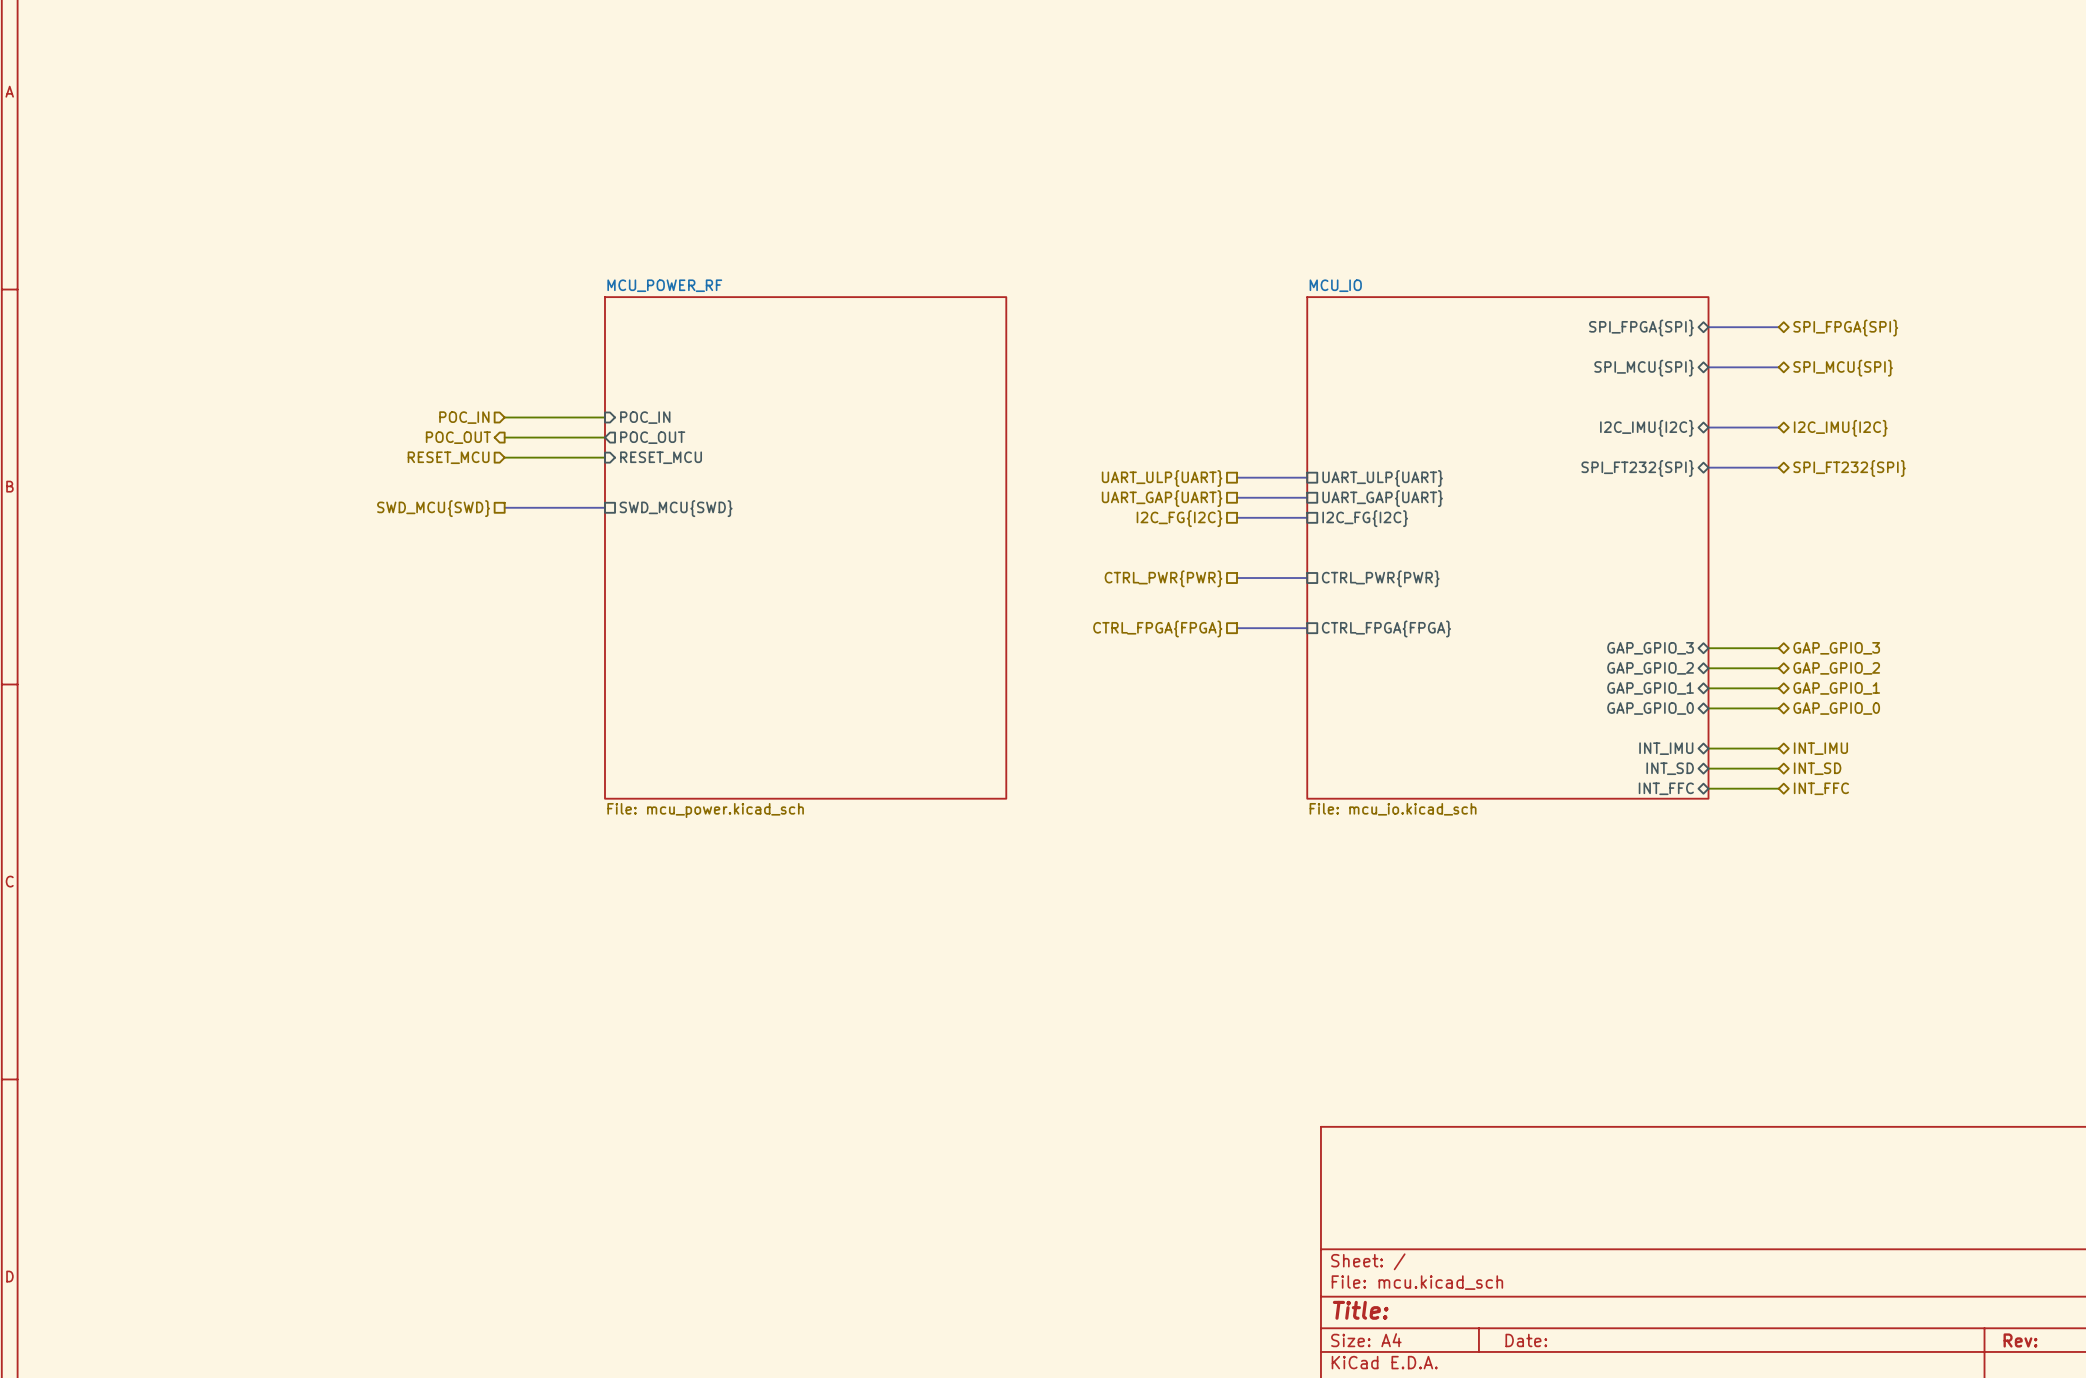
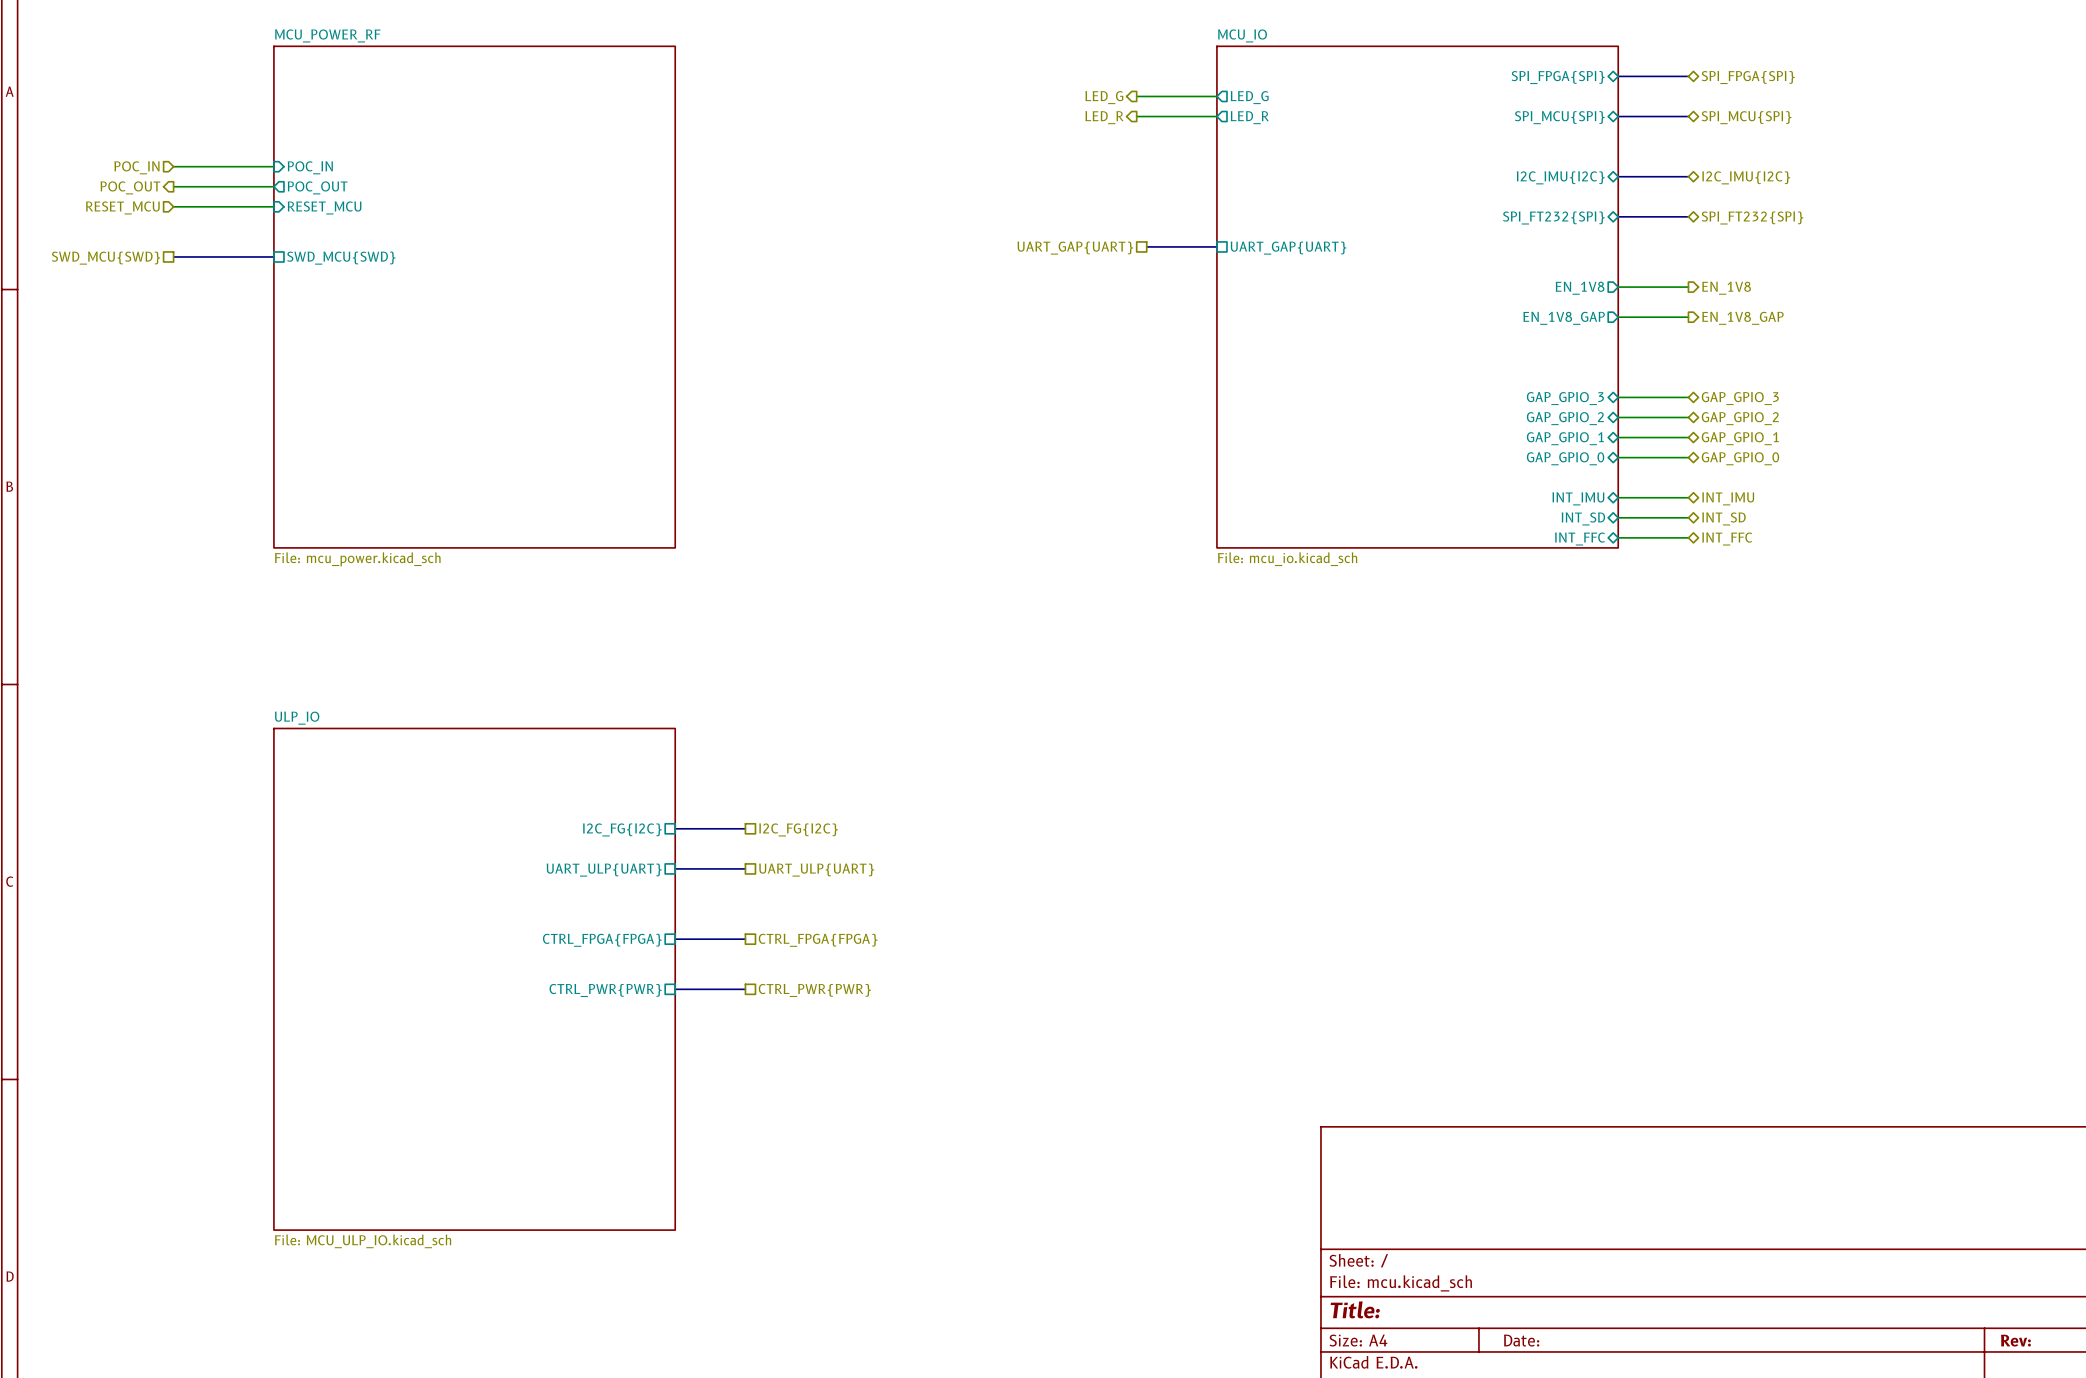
bus: none -> (1618, 76) (1688, 76)
sheet pin: none -> SPI_FPGA{SPI} (1558, 77)
hierarchical label: none -> SPI_FPGA{SPI} (1748, 77)
hierarchical label: none -> LED_G (1104, 97)
wire: none -> (1136, 96) (1216, 96)
sheet pin: none -> LED_G (1249, 97)
hierarchical label: none -> LED_R (1104, 117)
wire: none -> (1136, 116) (1216, 116)
sheet pin: none -> LED_R (1249, 117)
bus: none -> (1618, 116) (1688, 116)
sheet pin: none -> SPI_MCU{SPI} (1559, 117)
hierarchical label: none -> SPI_MCU{SPI} (1746, 117)
hierarchical label: none -> POC_IN (136, 167)
wire: none -> (173, 166) (273, 166)
sheet pin: none -> POC_IN (310, 167)
sheet pin: none -> I2C_IMU{I2C} (1560, 177)
hierarchical label: none -> I2C_IMU{I2C} (1746, 177)
hierarchical label: none -> POC_OUT (130, 187)
wire: none -> (173, 186) (273, 186)
sheet pin: none -> POC_OUT (317, 187)
hierarchical label: none -> RESET_MCU (122, 207)
wire: none -> (173, 206) (273, 206)
sheet pin: none -> RESET_MCU (324, 207)
sheet pin: none -> SPI_FT232{SPI} (1553, 217)
hierarchical label: none -> SPI_FT232{SPI} (1752, 217)
bus: none -> (1146, 246) (1216, 246)
hierarchical label: none -> UART_GAP{UART} (1075, 248)
sheet pin: none -> UART_GAP{UART} (1288, 248)
bus: none -> (173, 256) (273, 256)
hierarchical label: none -> SWD_MCU{SWD} (105, 258)
sheet pin: none -> SWD_MCU{SWD} (341, 258)
sheet pin: none -> EN_1V8 (1580, 288)
wire: none -> (1618, 287) (1688, 287)
hierarchical label: none -> EN_1V8 (1726, 288)
sheet MCU_POWER_RF: none -> File: mcu_power.kicad_sch (474, 297)
sheet MCU_IO: none -> File: mcu_io.kicad_sch (1417, 297)
sheet pin: none -> EN_1V8_GAP (1564, 318)
wire: none -> (1618, 317) (1688, 317)
hierarchical label: none -> EN_1V8_GAP (1742, 318)
bus: (1708, 327) (1778, 327) -> (1618, 176) (1688, 176)
sheet pin: SPI_FPGA{SPI} (1641, 328) -> none
hierarchical label: SPI_FPGA{SPI} (1845, 328) -> none
bus: (1708, 367) (1778, 367) -> (1618, 216) (1688, 216)
sheet pin: SPI_MCU{SPI} (1644, 368) -> none
hierarchical label: SPI_MCU{SPI} (1843, 368) -> none
sheet pin: none -> GAP_GPIO_3 (1565, 398)
wire: none -> (1618, 397) (1688, 397)
hierarchical label: none -> GAP_GPIO_3 (1740, 398)
hierarchical label: POC_IN (464, 417) -> none
wire: (504, 417) (604, 417) -> none
sheet pin: POC_IN (645, 417) -> none
sheet pin: none -> GAP_GPIO_2 (1565, 418)
wire: none -> (1618, 417) (1688, 417)
hierarchical label: none -> GAP_GPIO_2 (1740, 418)
bus: (1708, 427) (1778, 427) -> none
sheet pin: I2C_IMU{I2C} (1646, 428) -> none
hierarchical label: I2C_IMU{I2C} (1840, 428) -> none
hierarchical label: POC_OUT (458, 437) -> none
wire: (504, 437) (604, 437) -> none
sheet pin: POC_OUT (652, 437) -> none
sheet pin: none -> GAP_GPIO_1 (1565, 438)
wire: none -> (1618, 437) (1688, 437)
hierarchical label: none -> GAP_GPIO_1 (1740, 438)
hierarchical label: RESET_MCU (448, 457) -> none
wire: (504, 457) (604, 457) -> none
sheet pin: RESET_MCU (661, 457) -> none
sheet pin: none -> GAP_GPIO_0 (1565, 458)
wire: none -> (1618, 457) (1688, 457)
hierarchical label: none -> GAP_GPIO_0 (1740, 458)
bus: (1708, 467) (1778, 467) -> none
sheet pin: SPI_FT232{SPI} (1637, 468) -> none
hierarchical label: SPI_FT232{SPI} (1849, 468) -> none
bus: (1237, 477) (1307, 477) -> none
hierarchical label: UART_ULP{UART} (1162, 478) -> none
sheet pin: UART_ULP{UART} (1382, 478) -> none
bus: (1237, 497) (1307, 497) -> none
sheet pin: none -> INT_IMU (1578, 498)
hierarchical label: none -> INT_IMU (1728, 498)
hierarchical label: UART_GAP{UART} (1162, 498) -> none
sheet pin: UART_GAP{UART} (1382, 498) -> none
bus: (504, 507) (604, 507) -> none
hierarchical label: SWD_MCU{SWD} (433, 508) -> none
sheet pin: SWD_MCU{SWD} (676, 508) -> none
bus: (1237, 517) (1307, 517) -> none
sheet pin: none -> INT_SD (1583, 518)
hierarchical label: none -> INT_SD (1723, 518)
hierarchical label: I2C_FG{I2C} (1179, 518) -> none
sheet pin: I2C_FG{I2C} (1365, 518) -> none
sheet pin: none -> INT_FFC (1580, 539)
hierarchical label: none -> INT_FFC (1727, 539)
sheet MCU_POWER_RF: File: mcu_power.kicad_sch (805, 547) -> none
sheet MCU_IO: File: mcu_io.kicad_sch (1507, 547) -> none
hierarchical label: CTRL_PWR{PWR} (1163, 578) -> none
bus: (1237, 578) (1307, 578) -> none
sheet pin: CTRL_PWR{PWR} (1380, 578) -> none
hierarchical label: CTRL_FPGA{FPGA} (1157, 628) -> none
bus: (1237, 628) (1307, 628) -> none
sheet pin: CTRL_FPGA{FPGA} (1386, 628) -> none
sheet pin: GAP_GPIO_3 (1650, 648) -> none
wire: (1708, 648) (1778, 648) -> (1618, 497) (1688, 497)
hierarchical label: GAP_GPIO_3 (1836, 648) -> none
sheet pin: GAP_GPIO_2 (1650, 668) -> none
wire: (1708, 668) (1778, 668) -> (1618, 517) (1688, 517)
hierarchical label: GAP_GPIO_2 (1836, 668) -> none
sheet pin: GAP_GPIO_1 (1650, 688) -> none
wire: (1708, 688) (1778, 688) -> (1618, 537) (1688, 537)
hierarchical label: GAP_GPIO_1 (1836, 688) -> none
sheet pin: GAP_GPIO_0 (1650, 708) -> none
wire: (1708, 708) (1778, 708) -> none
hierarchical label: GAP_GPIO_0 (1836, 708) -> none
sheet pin: INT_IMU (1666, 748) -> none
wire: (1708, 748) (1778, 748) -> none
hierarchical label: INT_IMU (1820, 748) -> none
sheet pin: INT_SD (1670, 768) -> none
wire: (1708, 768) (1778, 768) -> none
hierarchical label: INT_SD (1817, 768) -> none
sheet pin: INT_FFC (1666, 788) -> none
wire: (1708, 788) (1778, 788) -> none
hierarchical label: INT_FFC (1821, 788) -> none
bus: none -> (675, 828) (745, 828)
sheet pin: none -> I2C_FG{I2C} (622, 829)
hierarchical label: none -> I2C_FG{I2C} (798, 829)
bus: none -> (675, 868) (745, 868)
sheet pin: none -> UART_ULP{UART} (604, 870)
hierarchical label: none -> UART_ULP{UART} (816, 870)
sheet pin: none -> CTRL_FPGA{FPGA} (602, 940)
bus: none -> (675, 939) (745, 939)
hierarchical label: none -> CTRL_FPGA{FPGA} (818, 940)
sheet ULP_IO: none -> File: MCU_ULP_IO.kicad_sch (474, 979)
bus: none -> (675, 989) (745, 989)
sheet pin: none -> CTRL_PWR{PWR} (605, 990)
hierarchical label: none -> CTRL_PWR{PWR} (814, 990)

